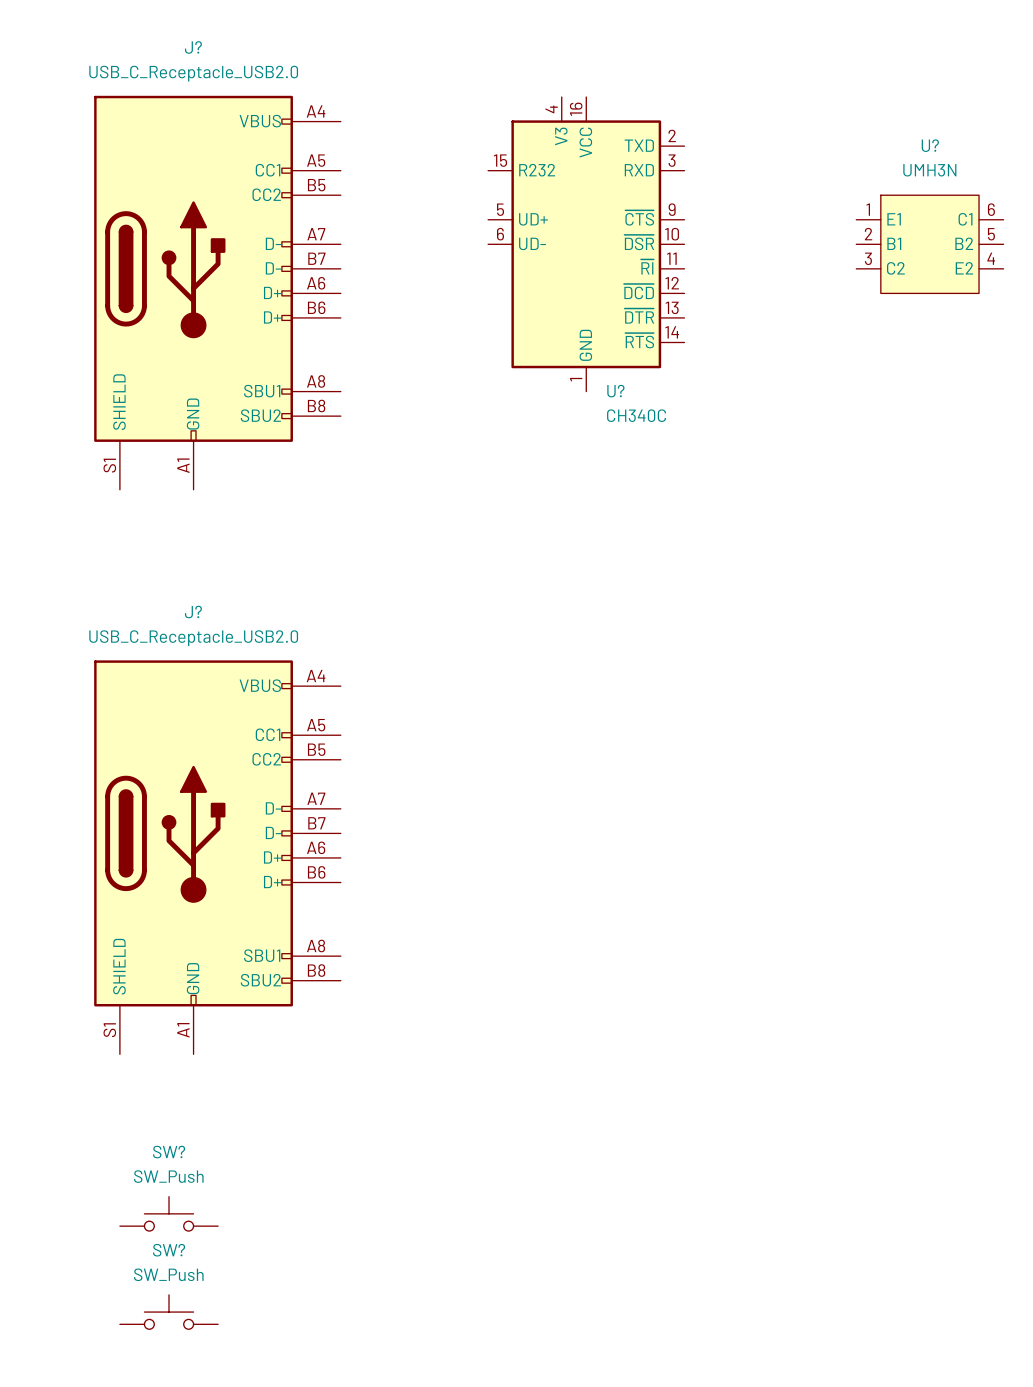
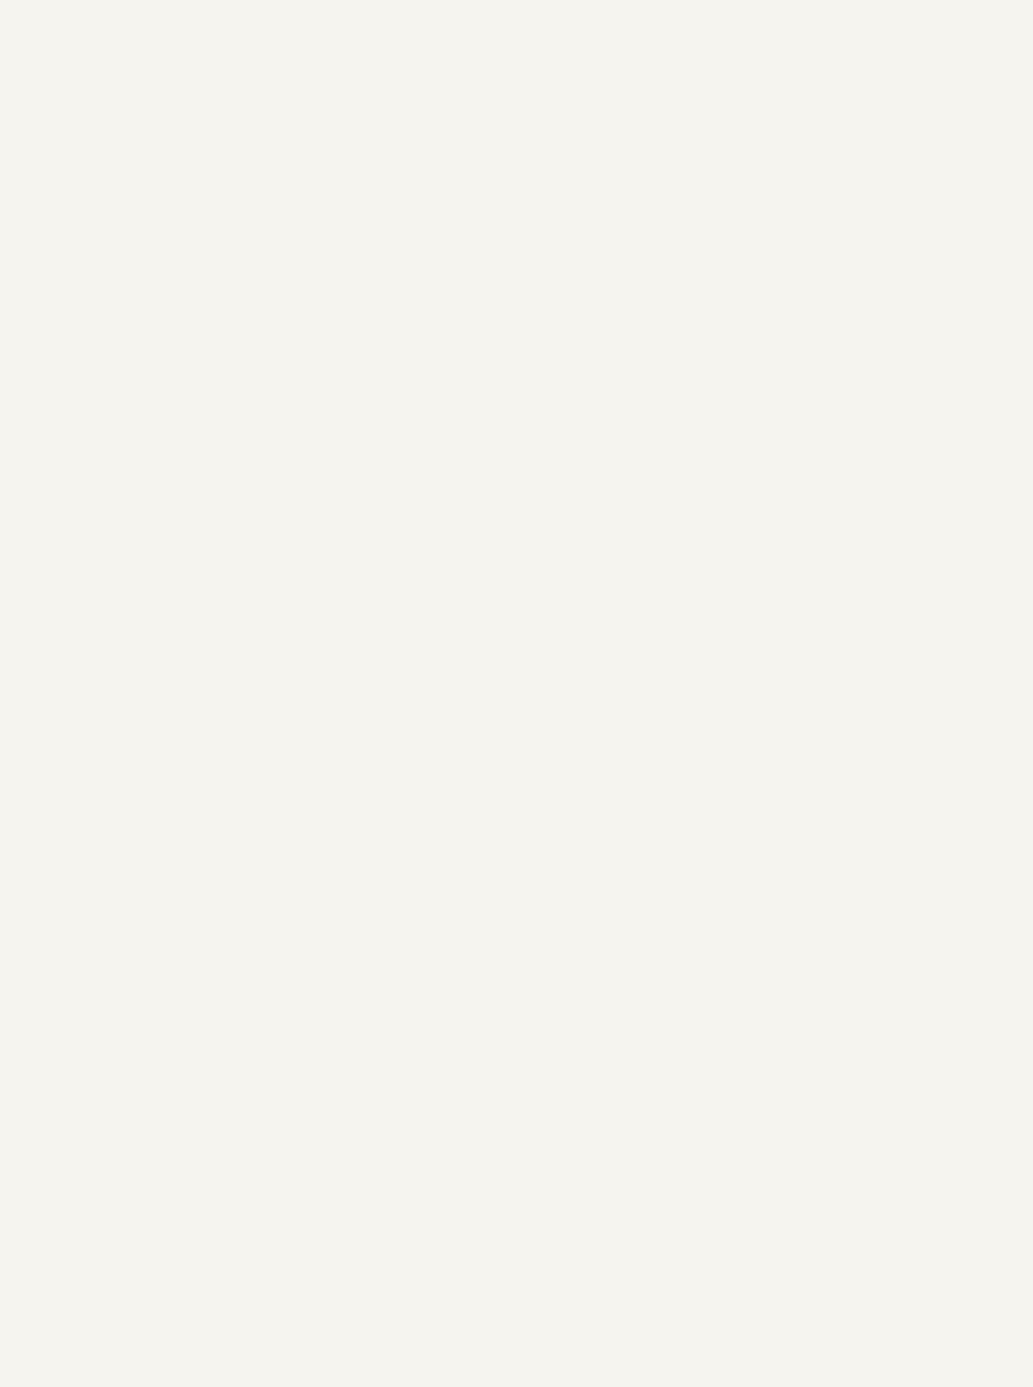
U?: CH340C (586, 244) -> none
U?: UMH3N (929, 244) -> none
J?: USB_C_Receptacle_USB2.0 (217, 292) -> none
J?: USB_C_Receptacle_USB2.0 (217, 857) -> none
SW?: SW_Push (169, 1213) -> none
SW?: SW_Push (169, 1312) -> none

